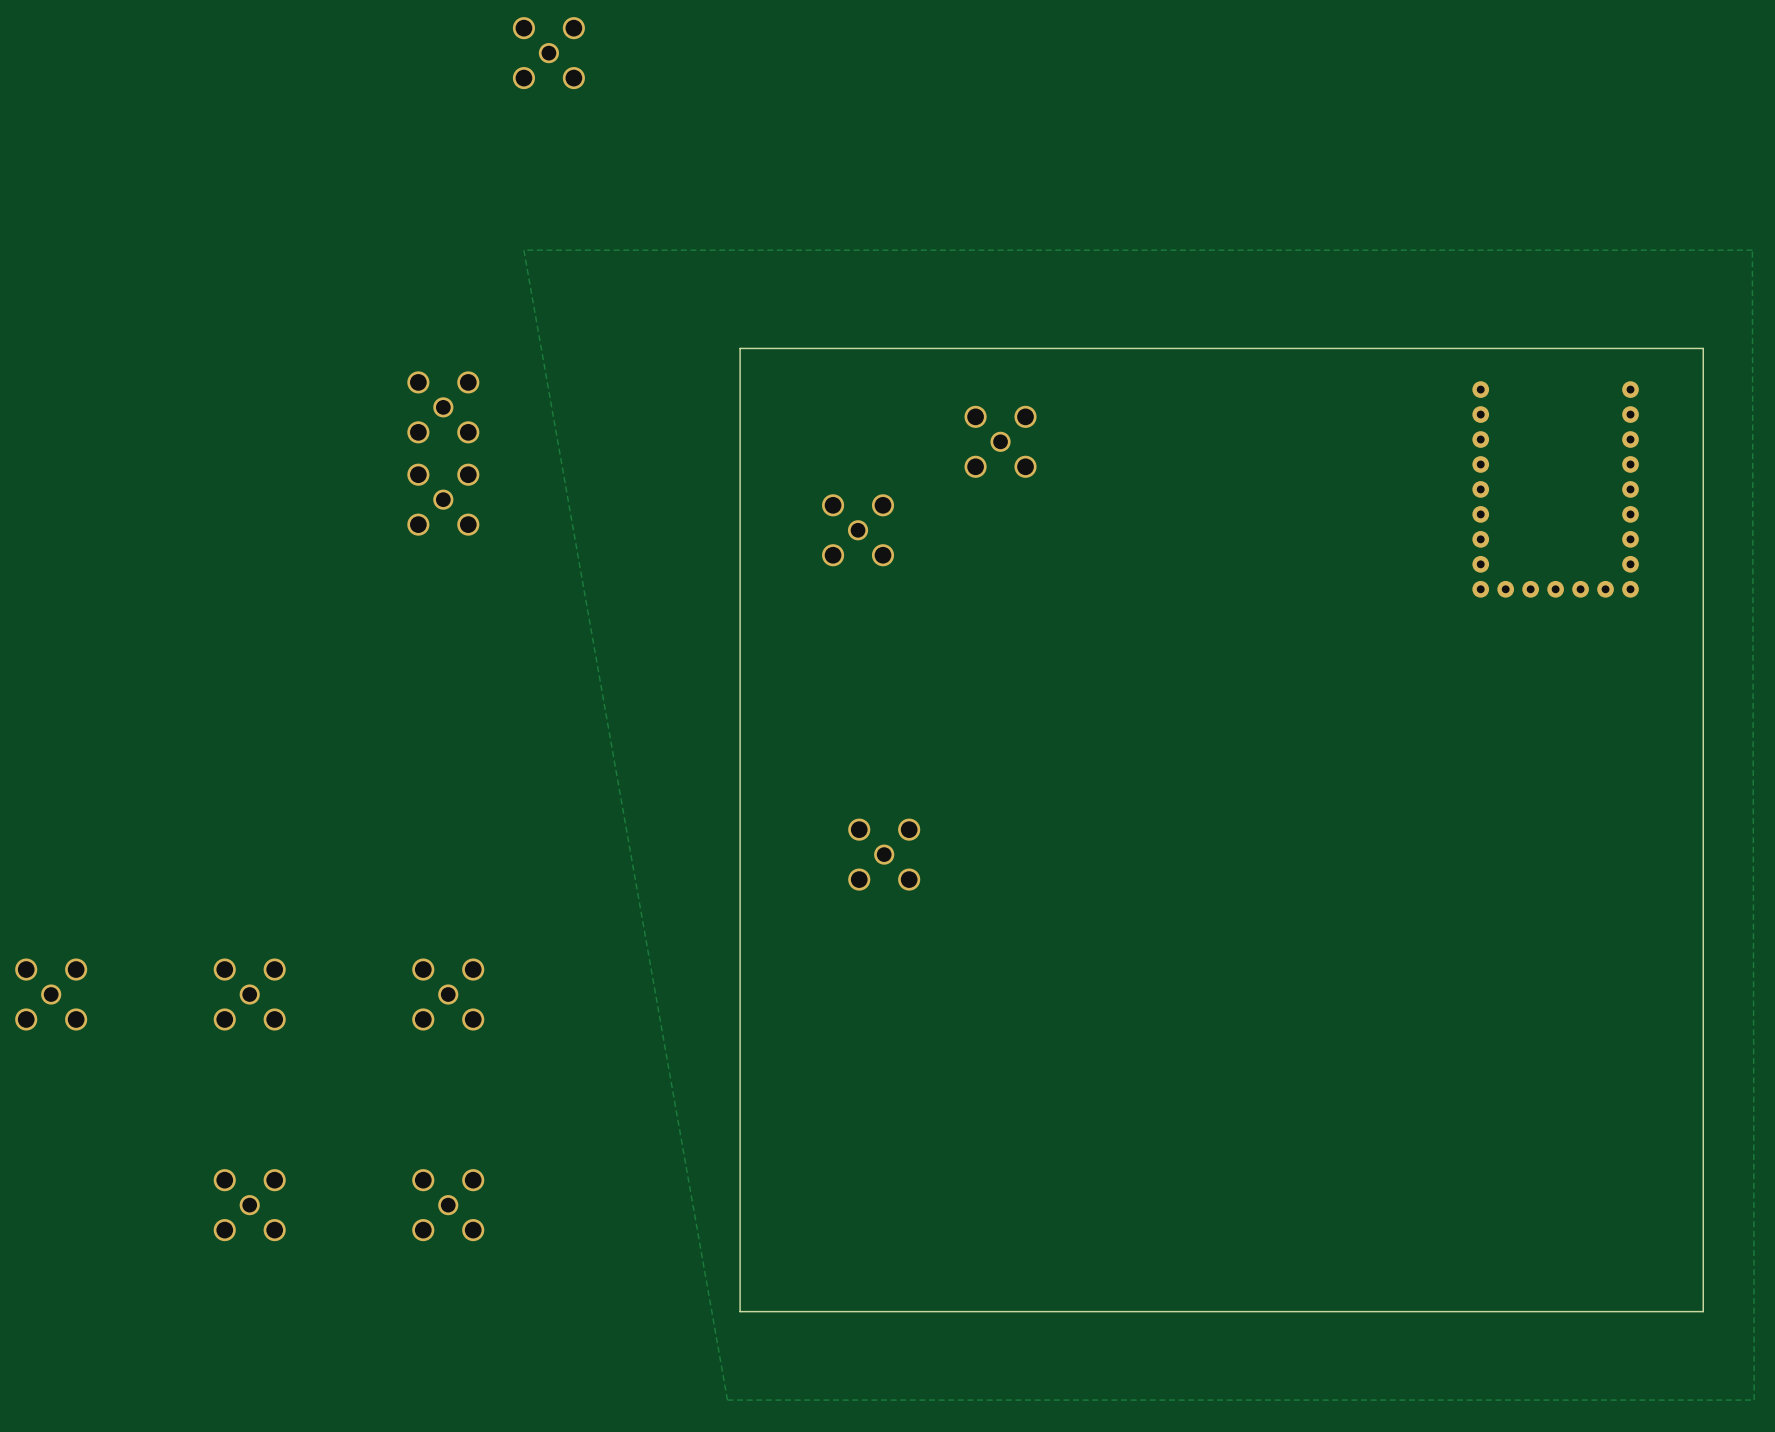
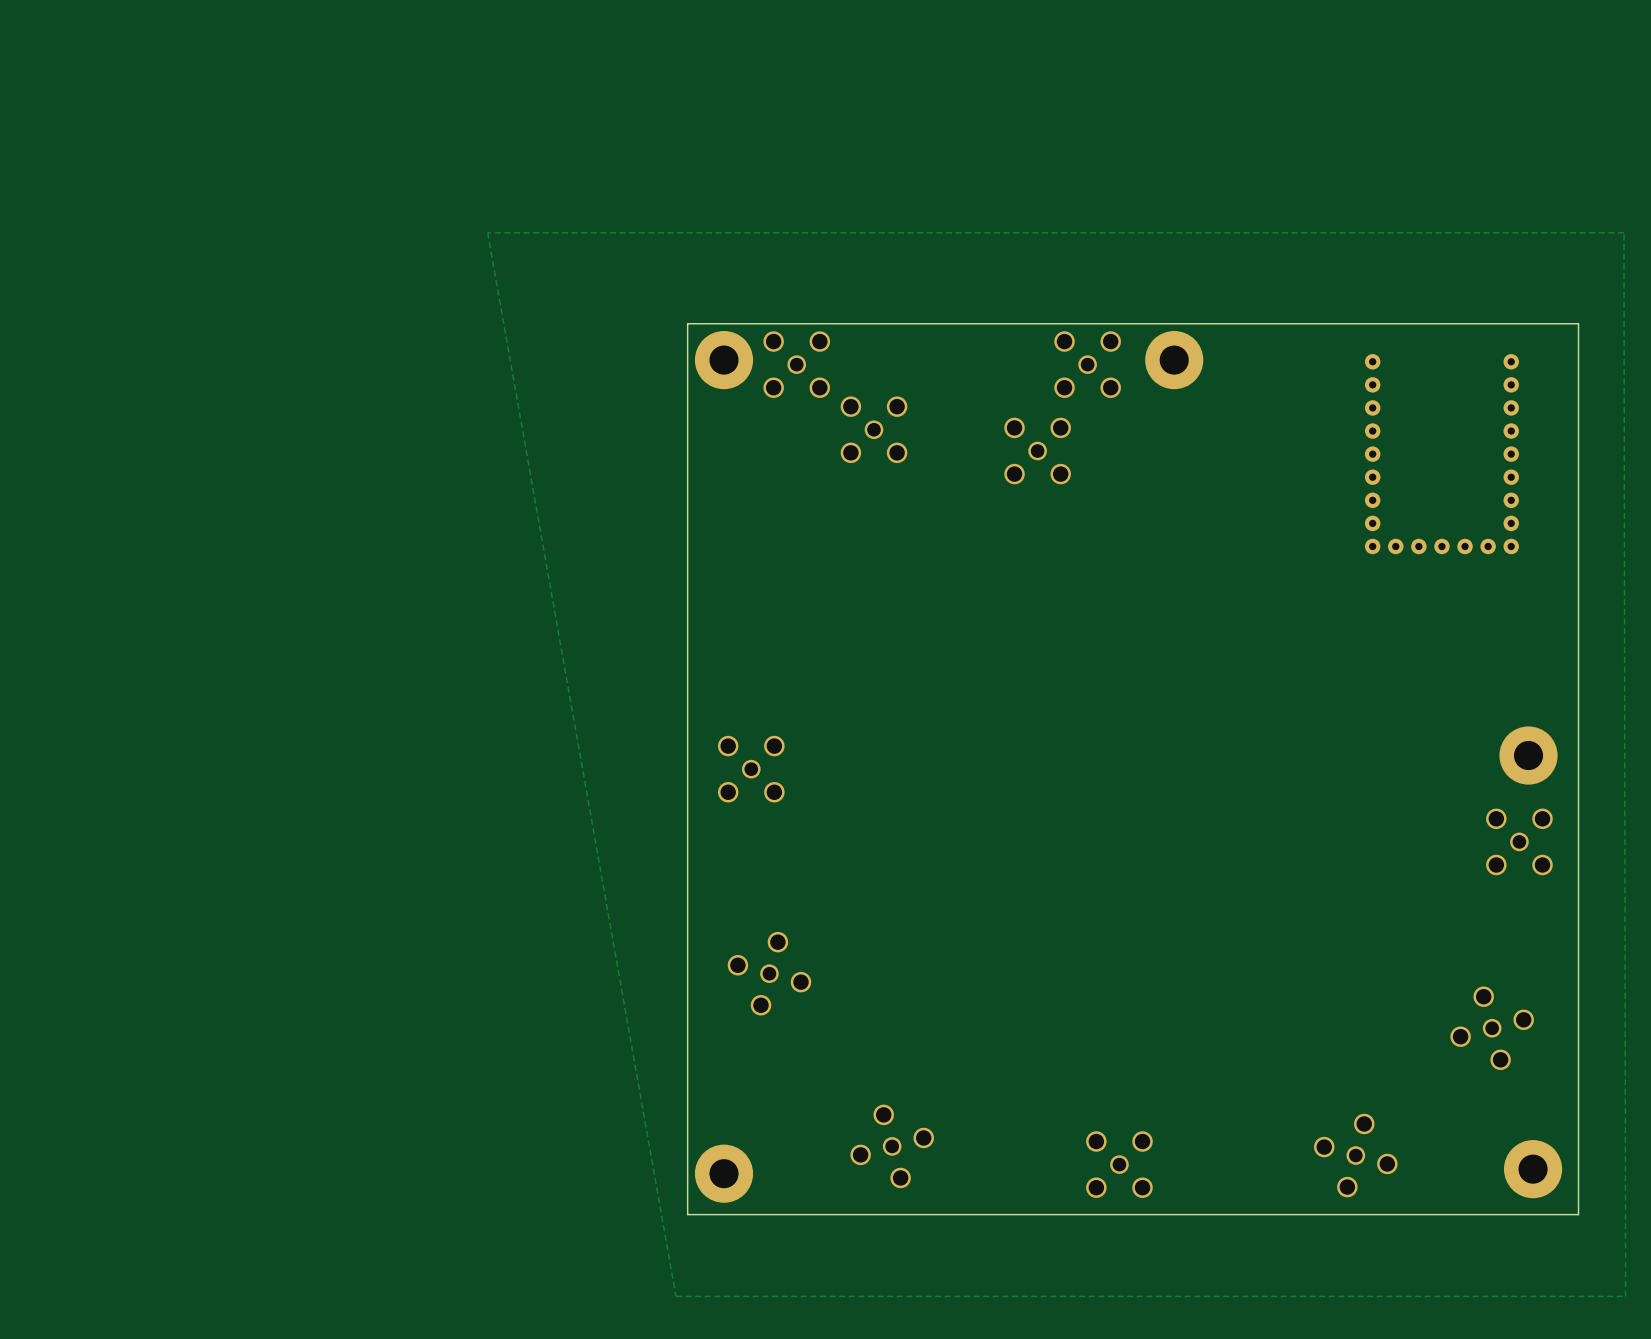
part: (548, 53) -> none
part: none -> (724, 360)
part: none -> (1174, 360)
part: none -> (796, 364)
part: none -> (1087, 364)
part: (443, 407) -> none
part: (1000, 441) -> none
part: none -> (874, 429)
part: none -> (1037, 451)
part: (443, 499) -> none
part: (858, 530) -> none
part: none -> (1528, 755)
part position: (884, 854) -> (751, 769)
part: none -> (1519, 841)
part: (51, 994) -> none
part: (249, 994) -> none
part: (448, 994) -> none
part: none -> (769, 973)
part: none -> (1492, 1028)
part: (249, 1205) -> none
part: (448, 1205) -> none
part: none -> (892, 1146)
part: none -> (1355, 1155)
part: none -> (1119, 1164)
part: none -> (1533, 1169)
part: none -> (724, 1173)

